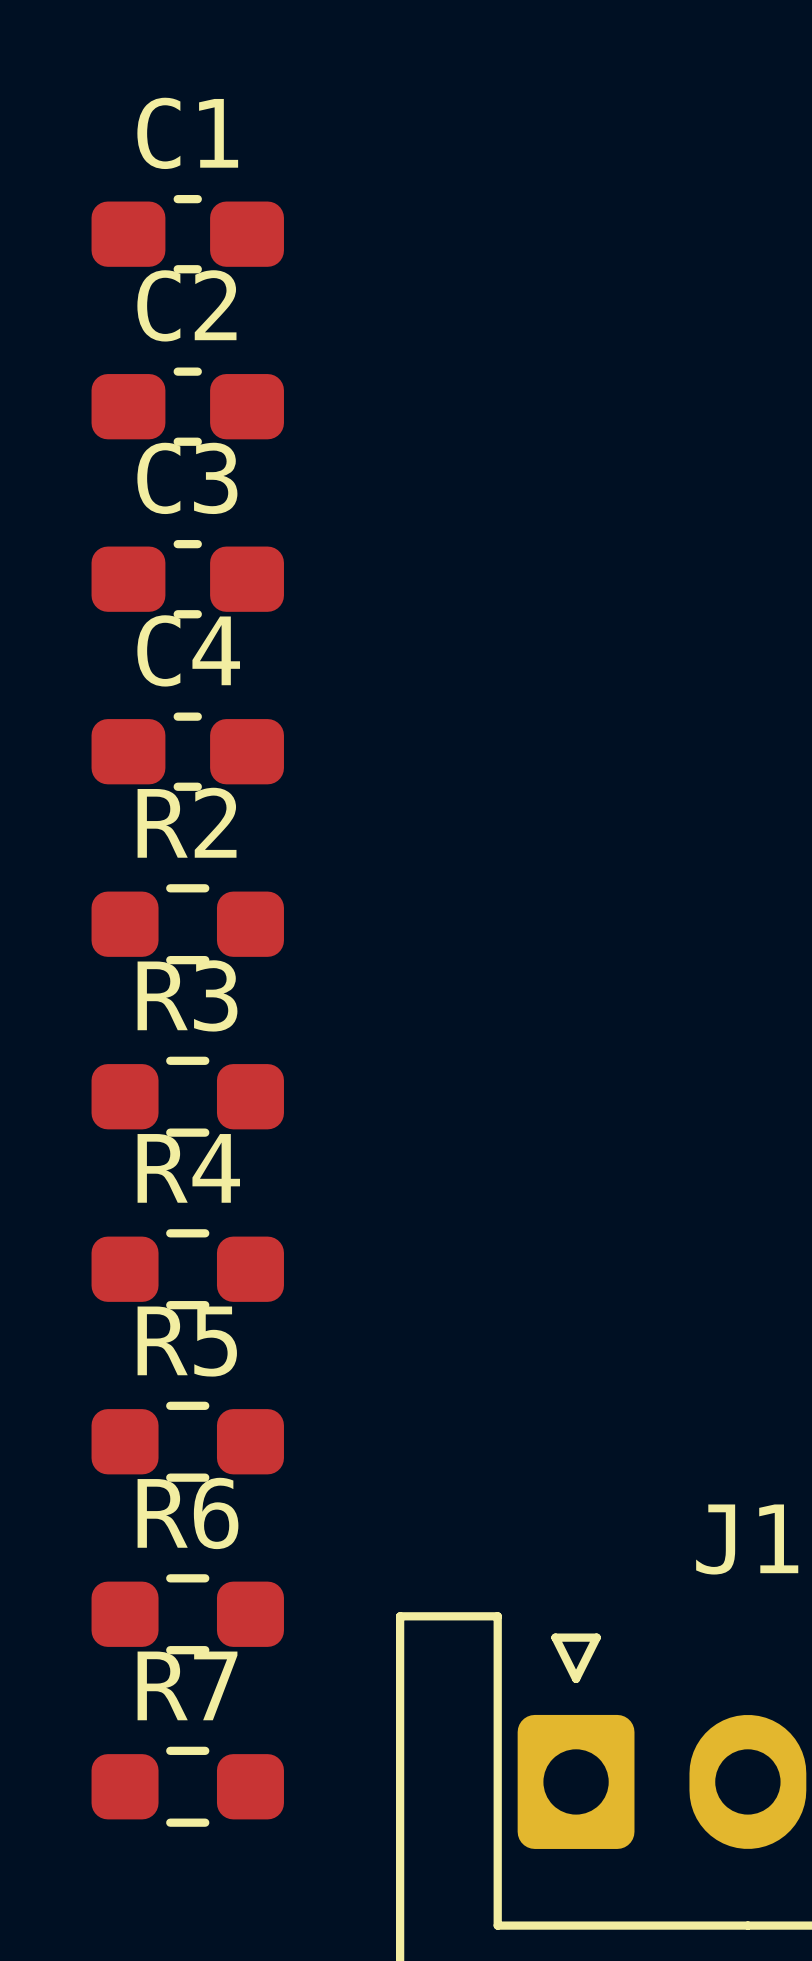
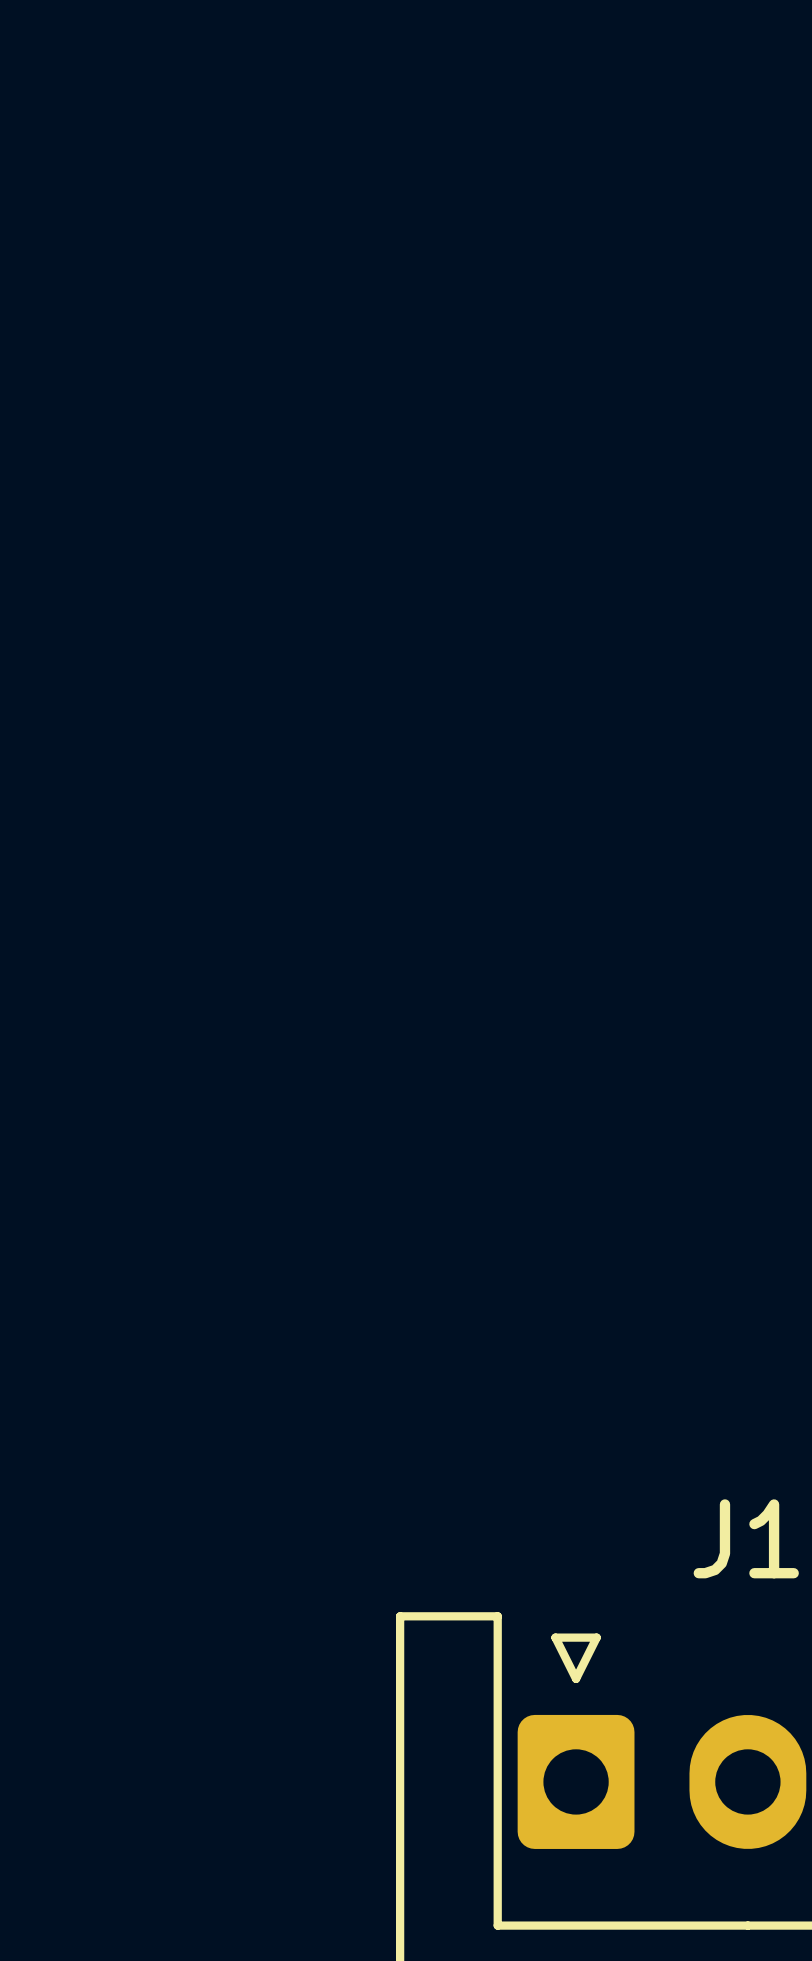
C1: (187, 234) -> none
C2: (187, 406) -> none
C3: (187, 579) -> none
C4: (187, 751) -> none
R2: (187, 924) -> none
R3: (187, 1096) -> none
R4: (187, 1269) -> none
R5: (187, 1441) -> none
R6: (187, 1614) -> none
R7: (187, 1786) -> none

